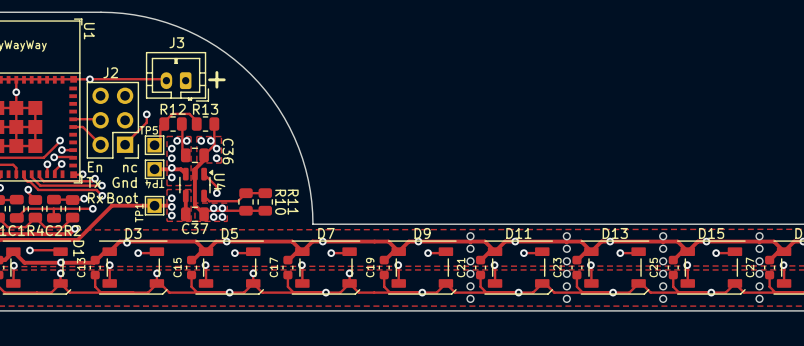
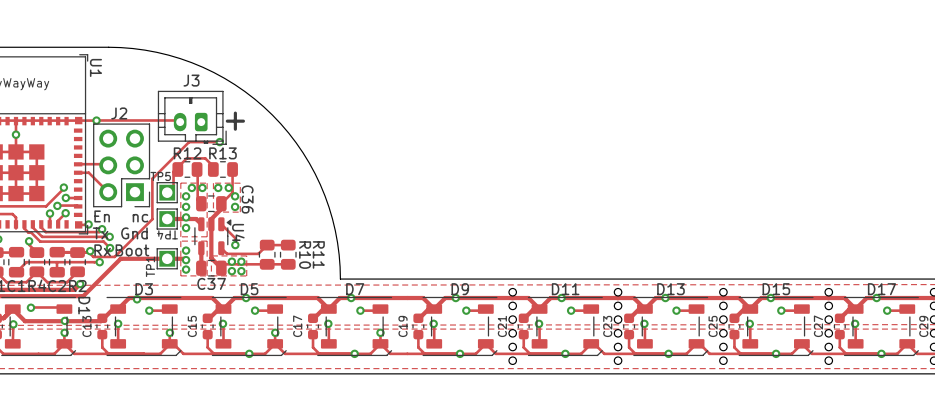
track: none -> (219, 142) (189, 142) (152, 178) (152, 219) (114, 256) (93, 256) (89, 252) (57, 252)
via: none -> (219, 142)
track: (146, 114) (146, 122) (124, 144) -> none
via: (146, 114) -> none

